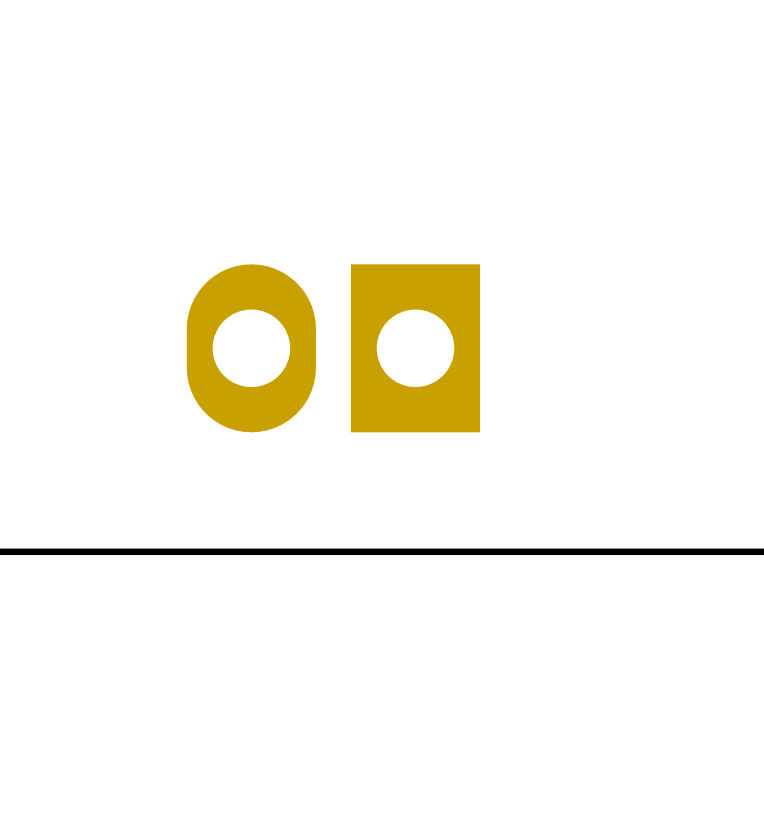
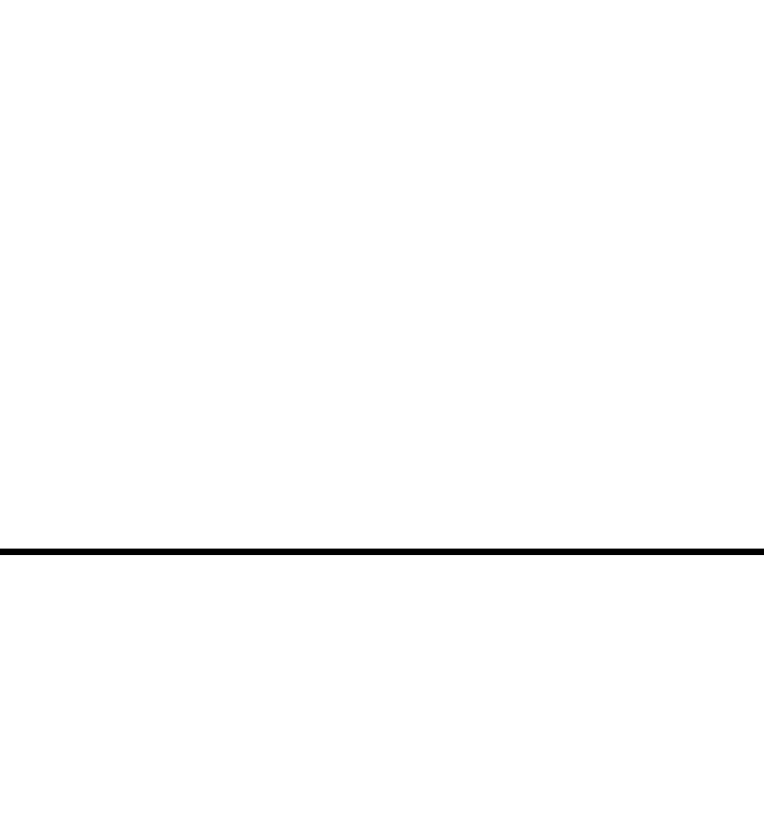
part: (333, 348) -> none

